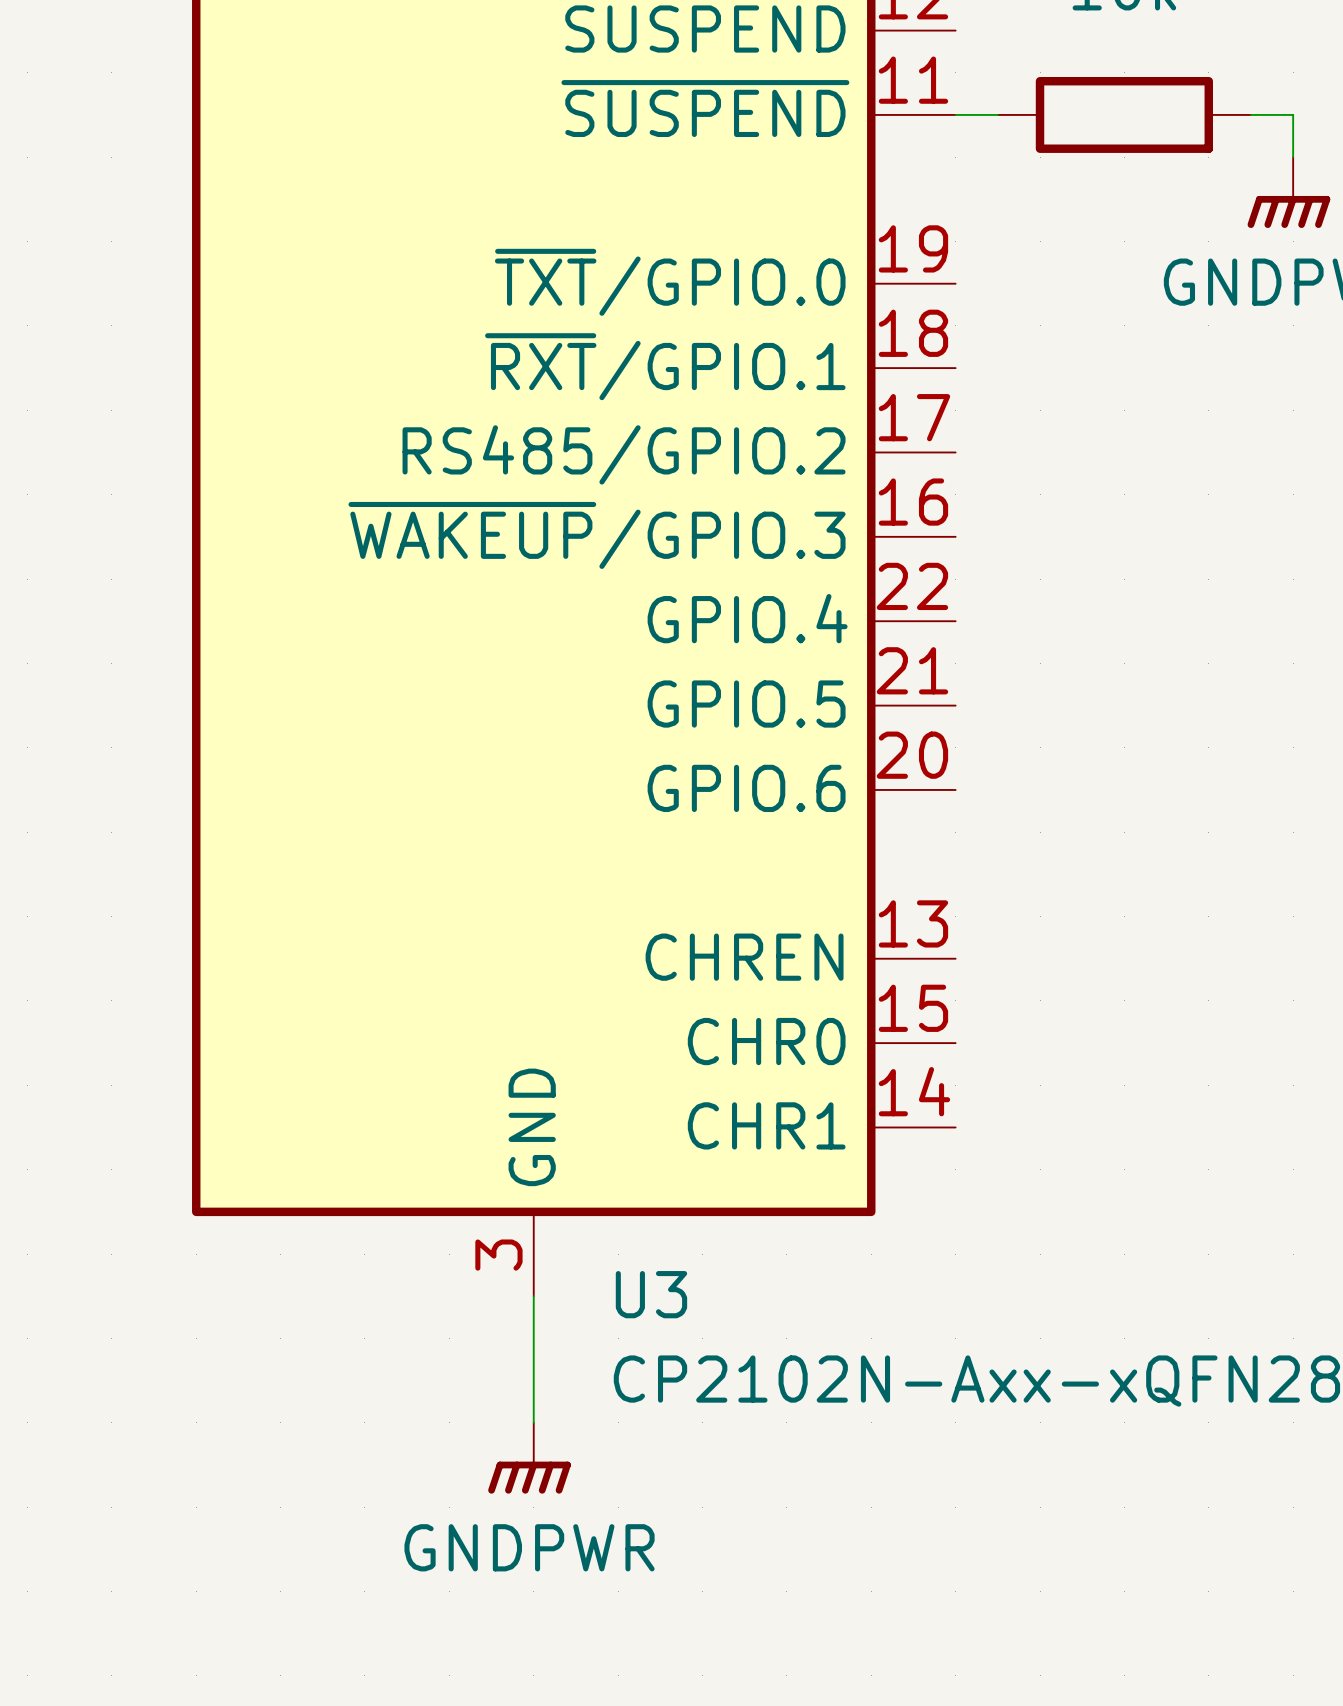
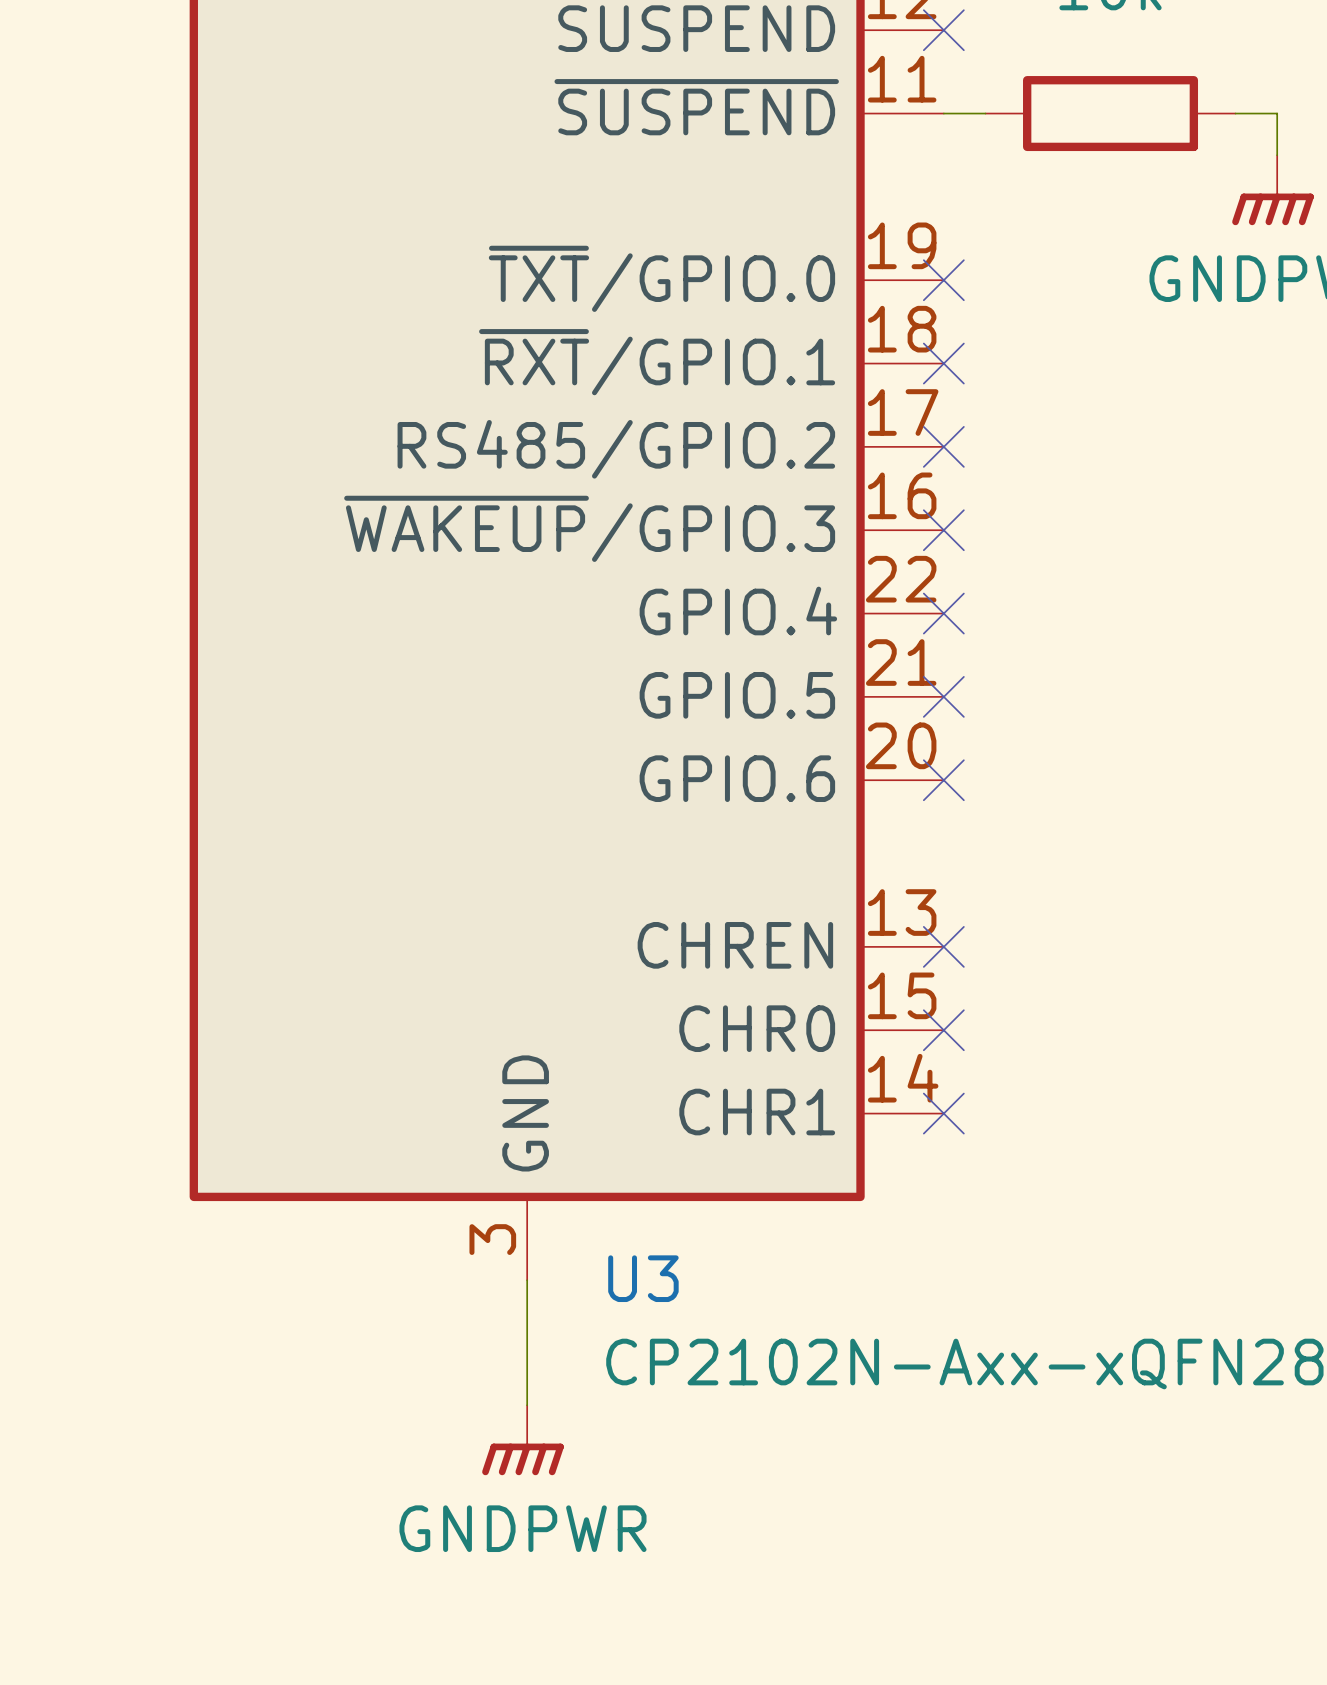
no-connect mark: none -> (943, 30)
no-connect mark: none -> (943, 280)
no-connect mark: none -> (943, 363)
no-connect mark: none -> (943, 446)
no-connect mark: none -> (943, 530)
no-connect mark: none -> (943, 613)
no-connect mark: none -> (943, 696)
no-connect mark: none -> (943, 780)
no-connect mark: none -> (943, 946)
no-connect mark: none -> (943, 1030)
no-connect mark: none -> (943, 1113)

